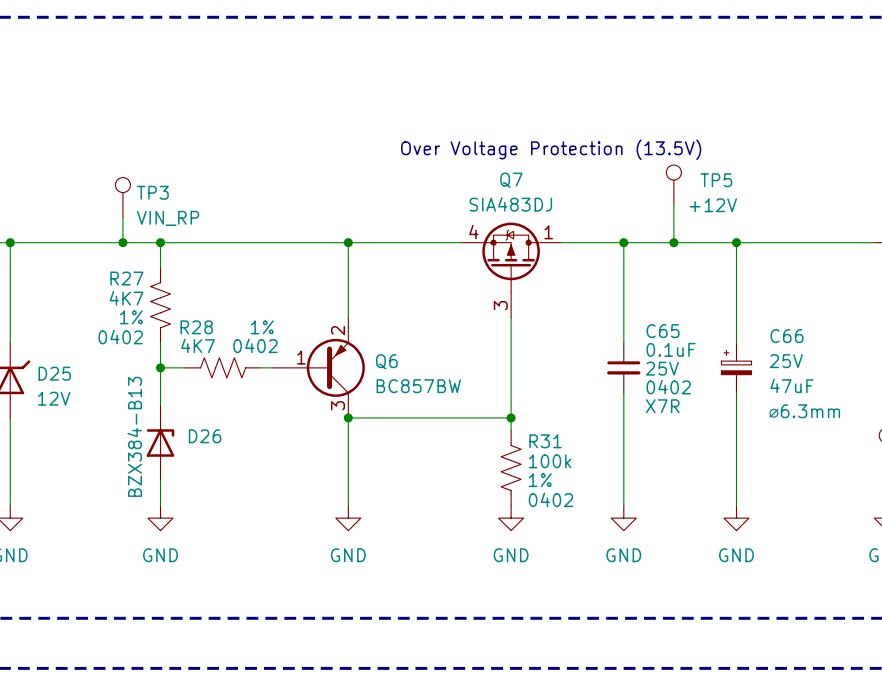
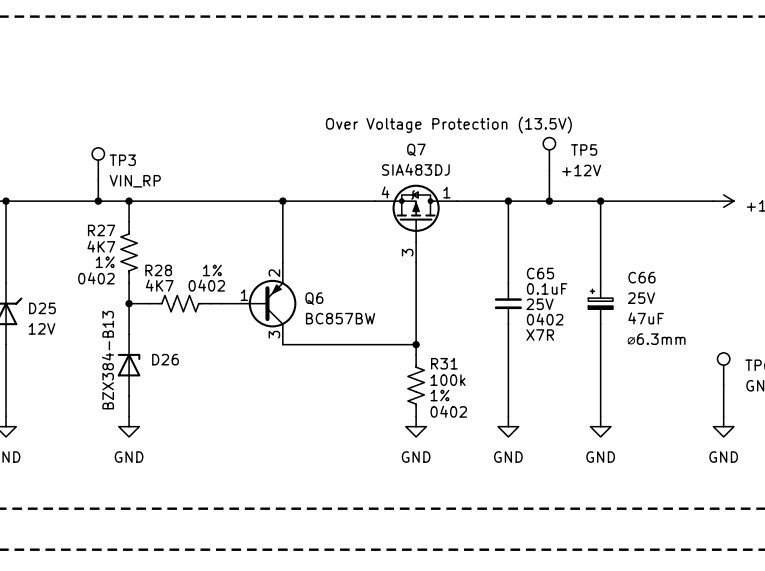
wire: (348, 417) (348, 505) -> none
junction: (348, 417) -> none
power symbol: GND (348, 518) -> none

